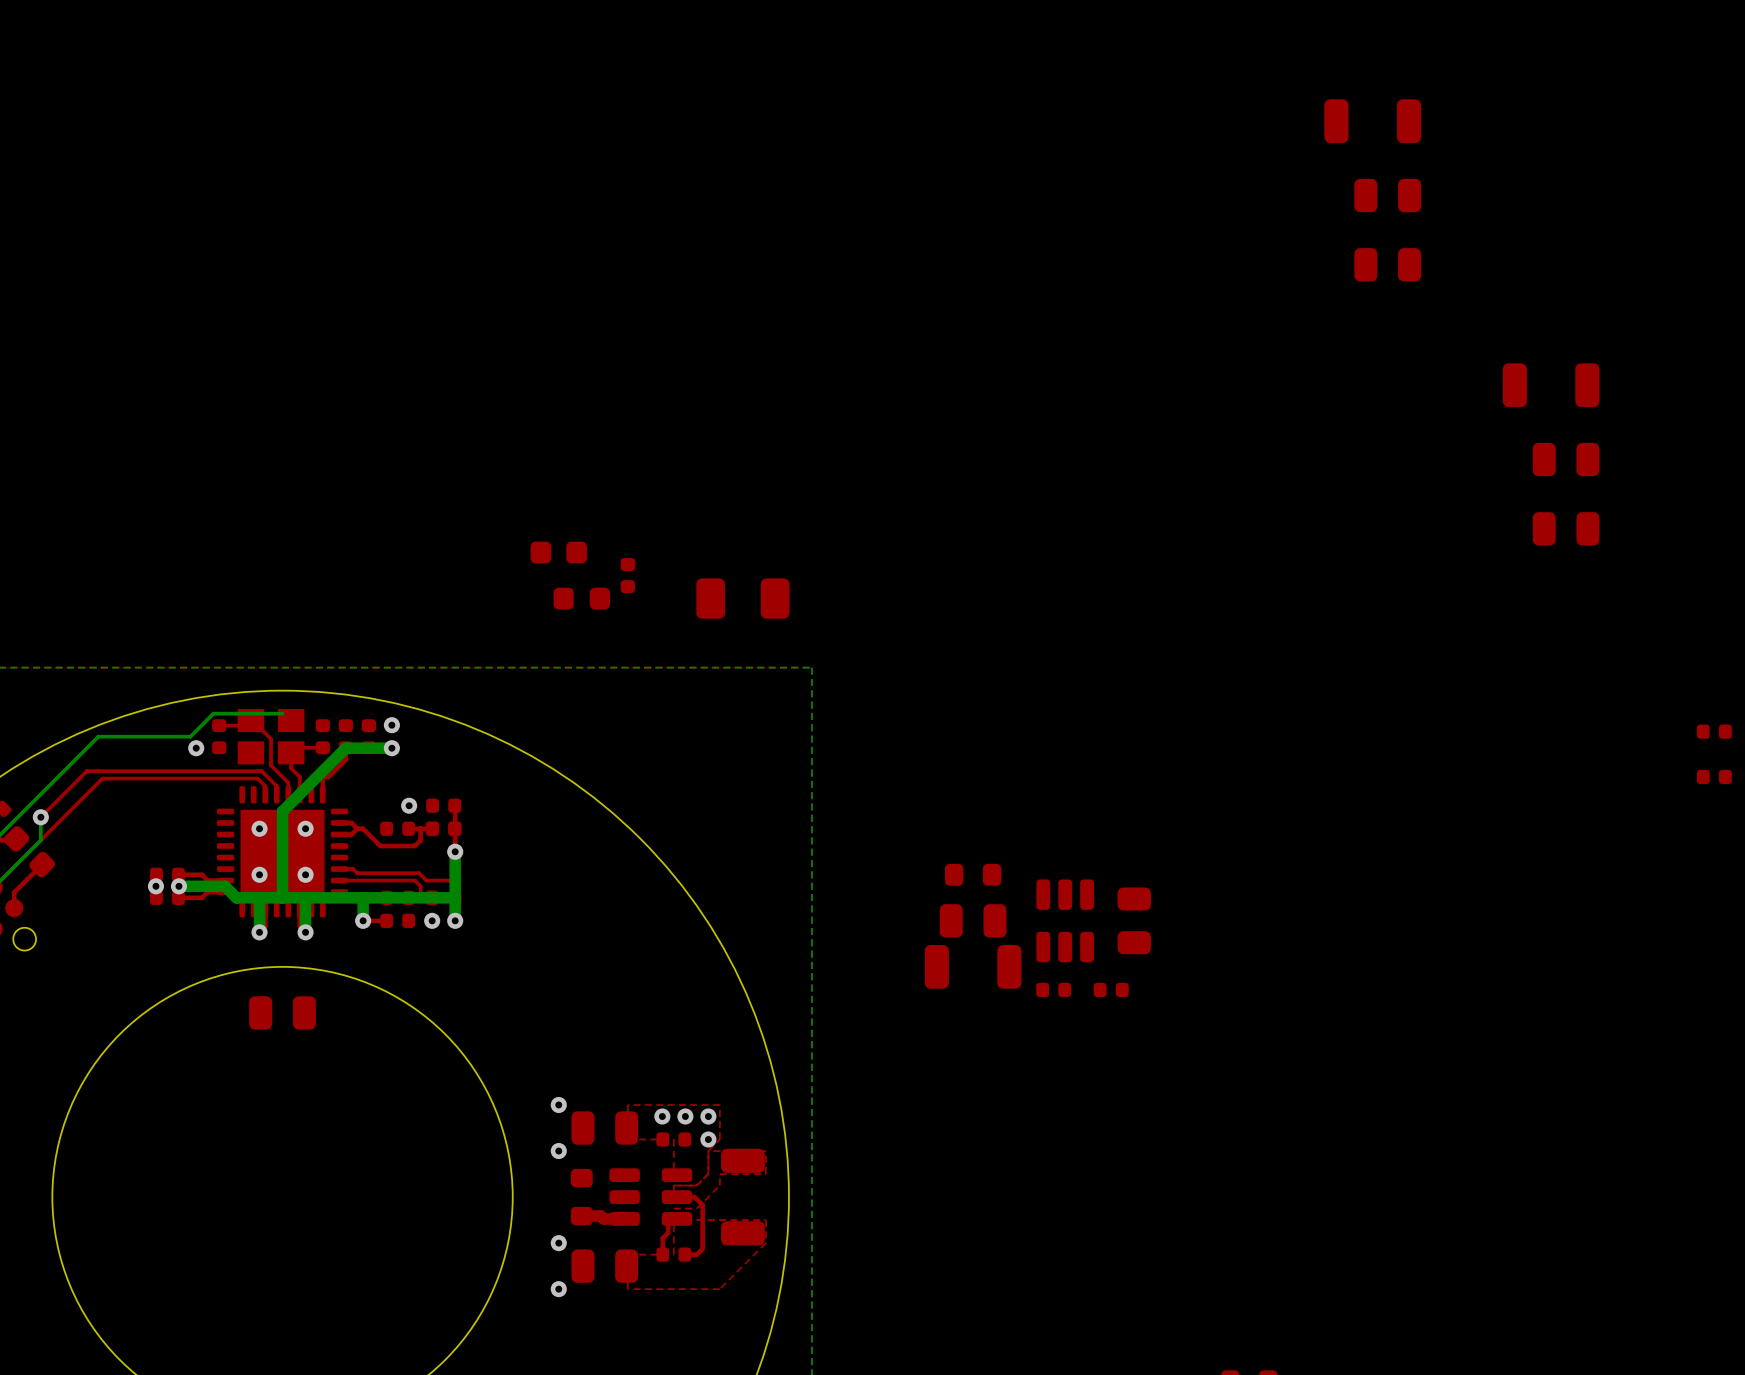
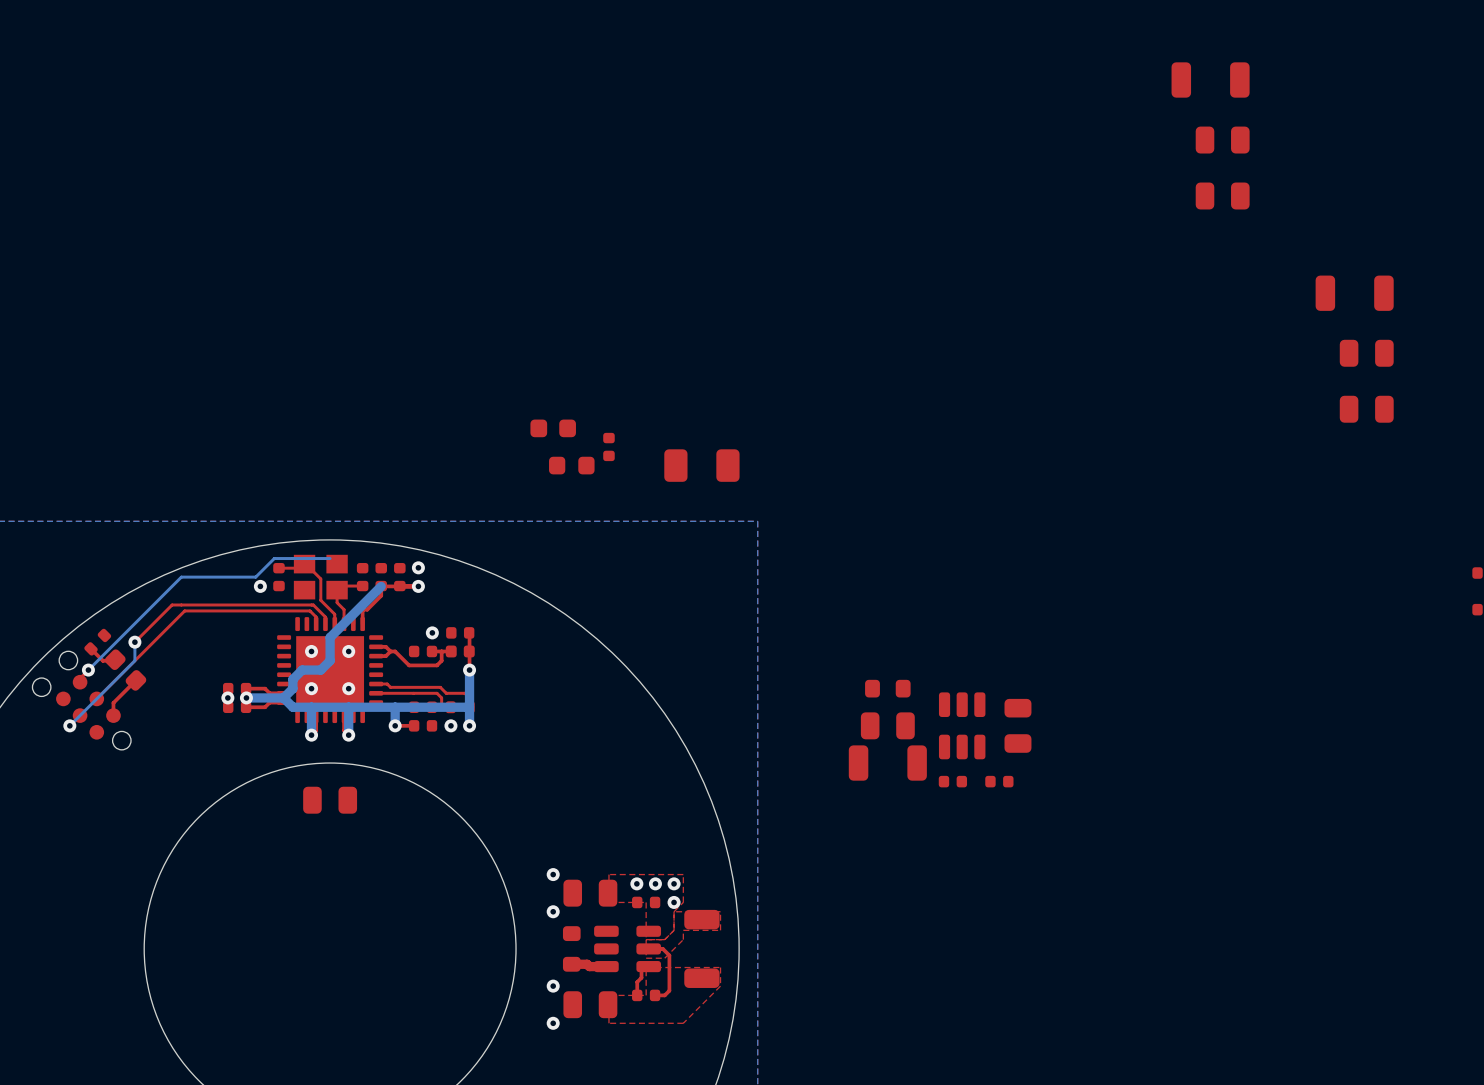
bottom track: (391, 748) (345, 748) -> none
bottom track: (282, 840) (282, 897) -> (330, 660) (320, 670) (302, 670) (292, 679) (292, 688) (283, 697)

